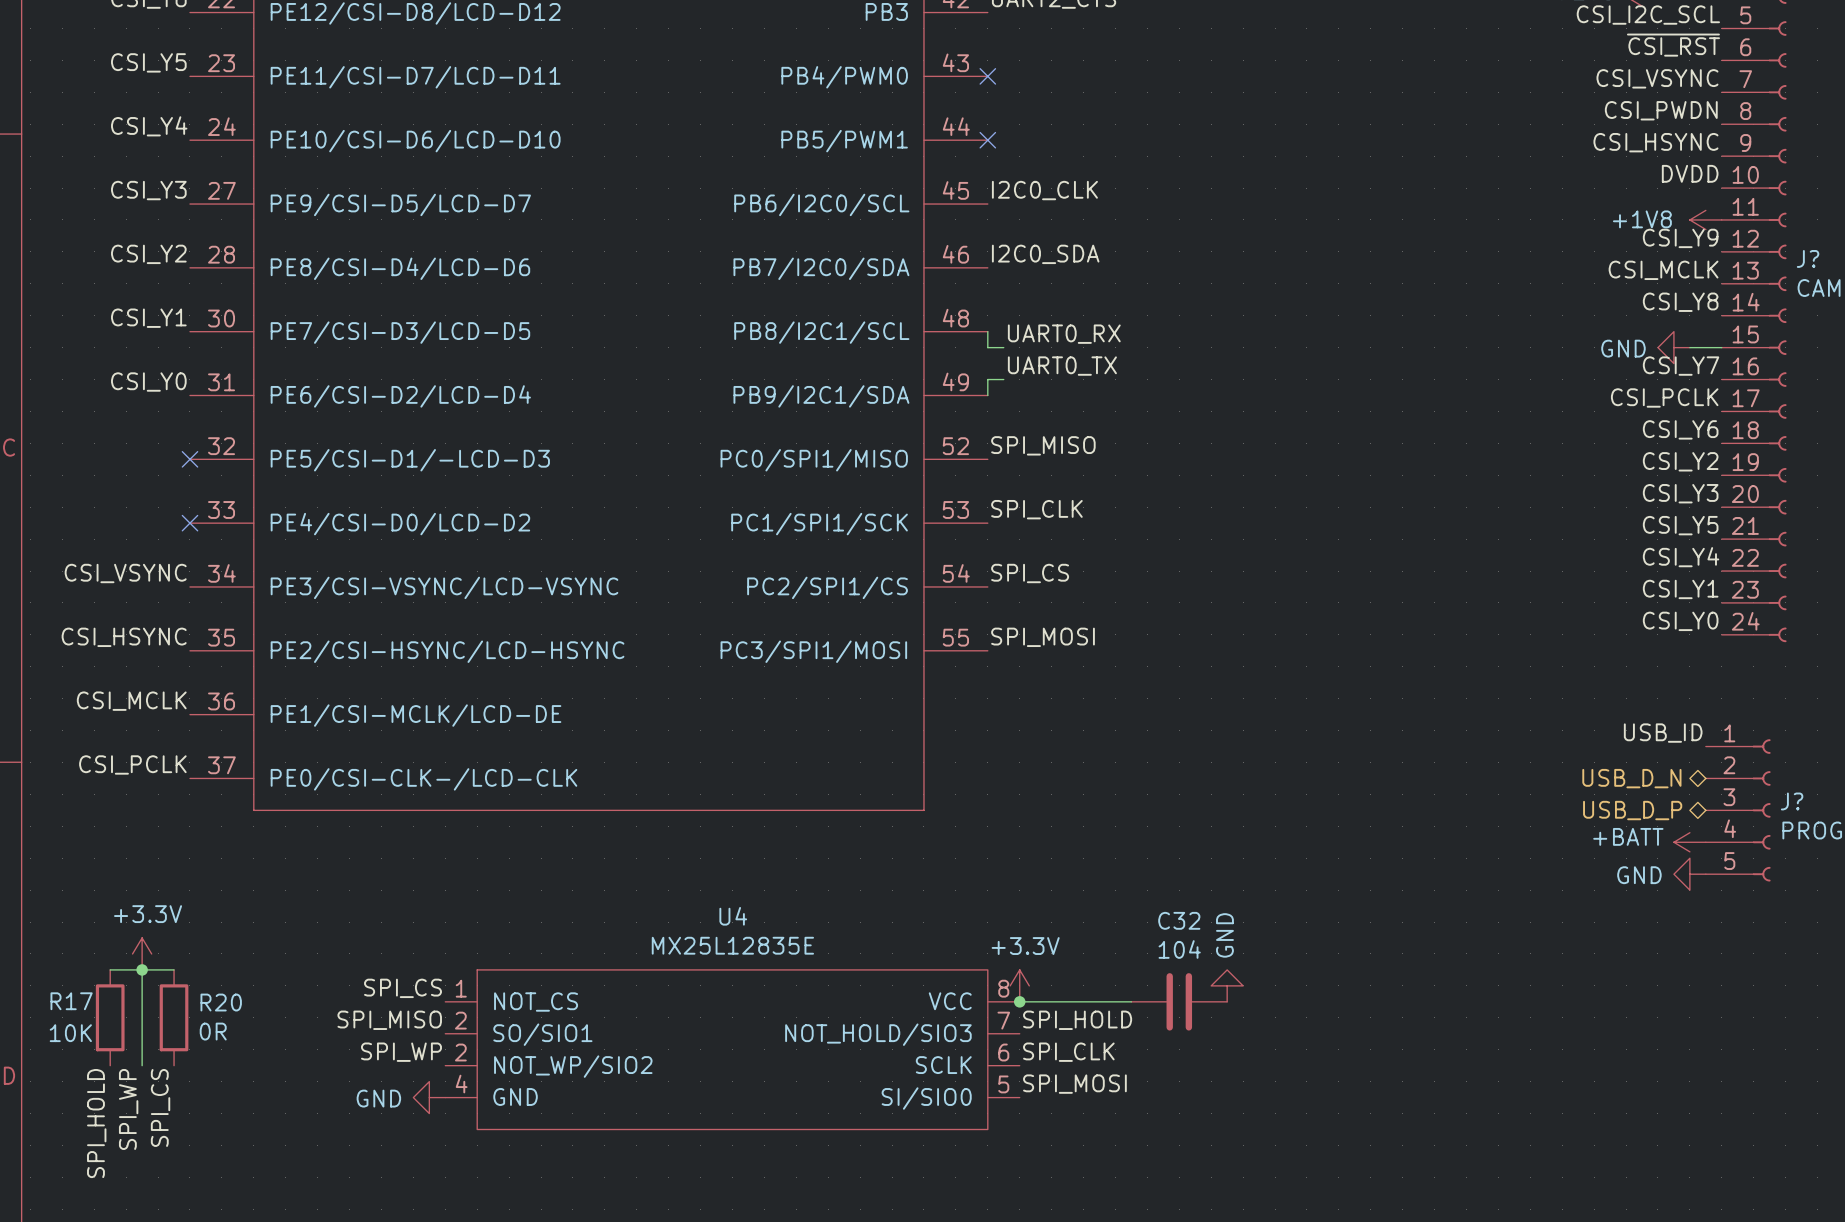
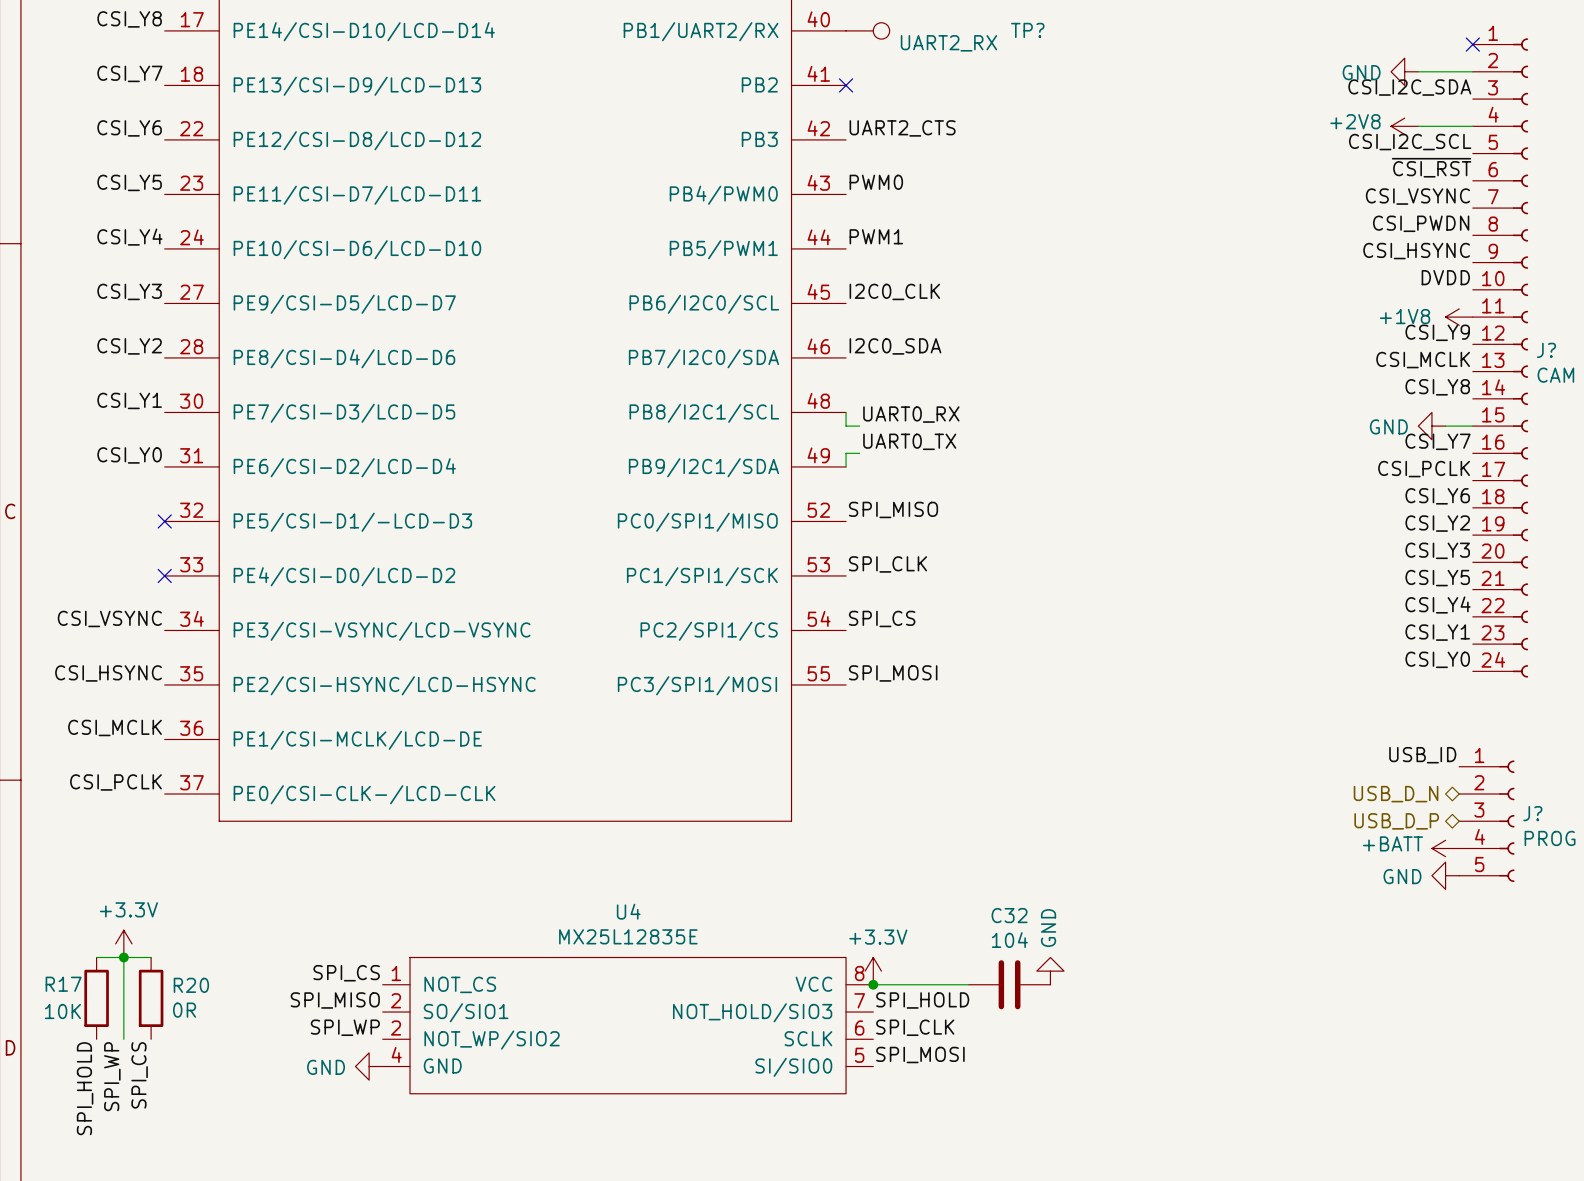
label: none -> PWM0 (876, 182)
no-connect mark: (987, 76) -> none
label: none -> PWM1 (876, 236)
no-connect mark: (987, 140) -> none

